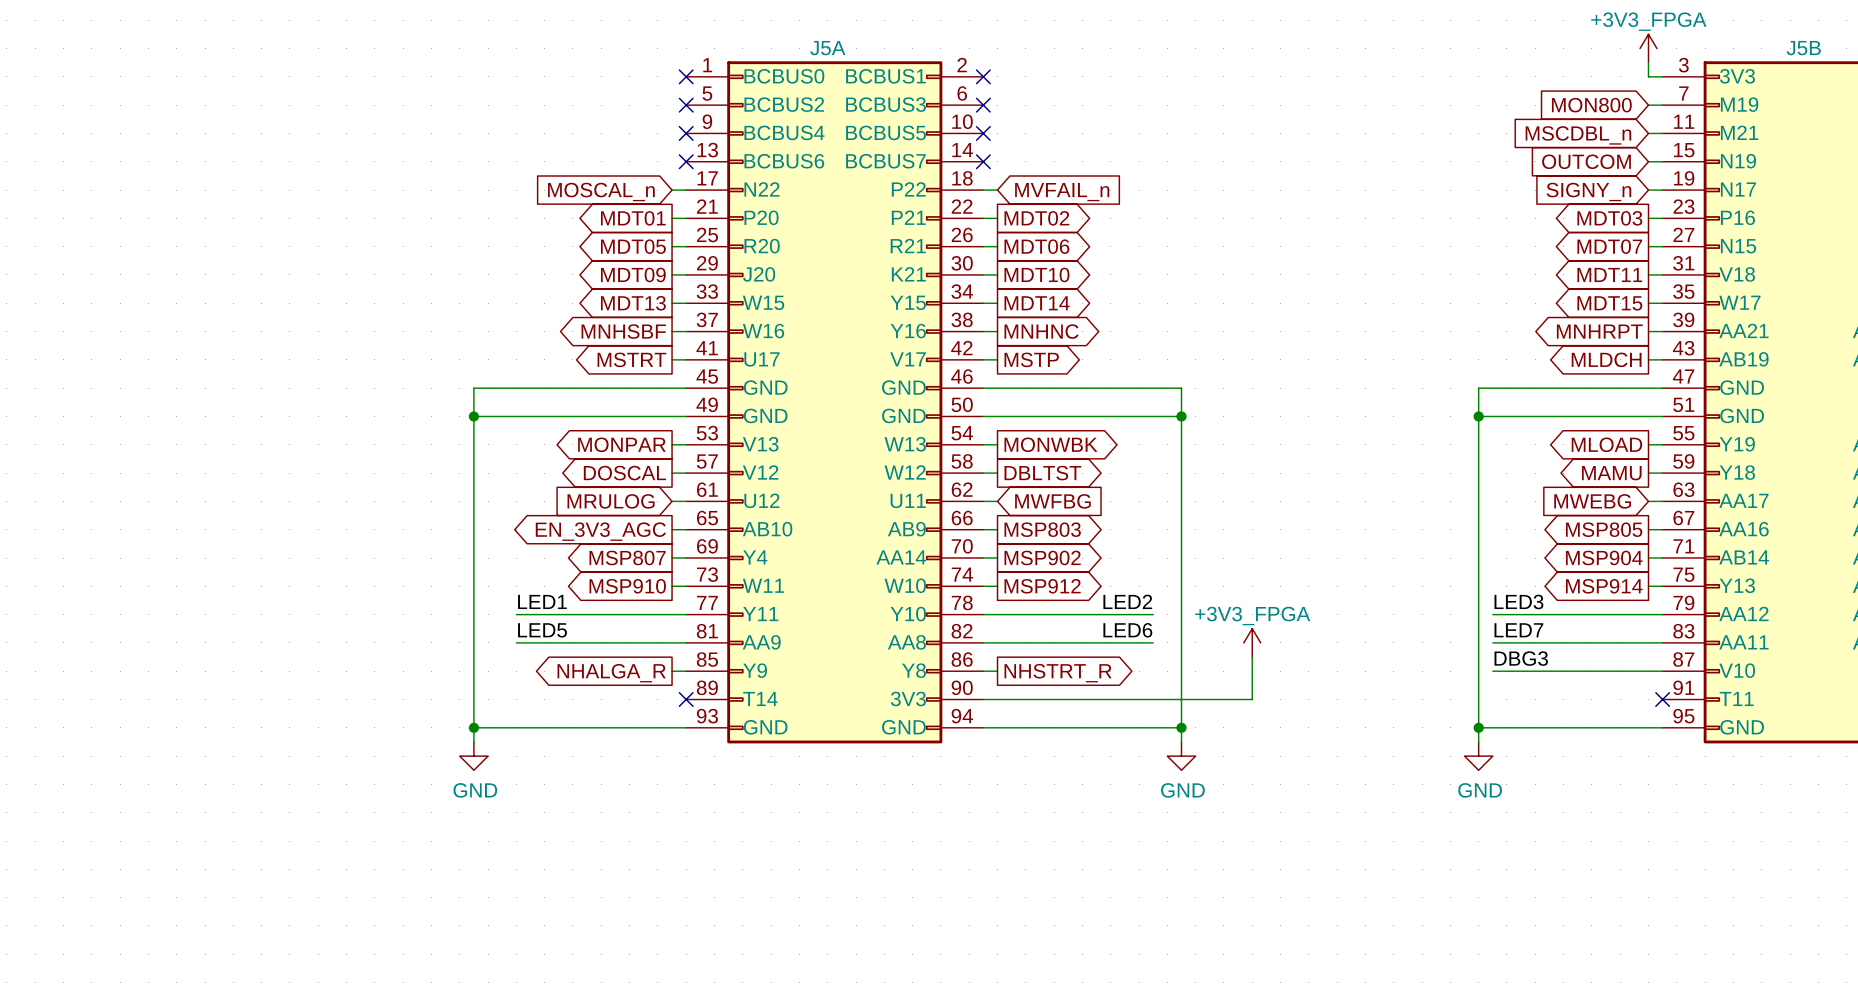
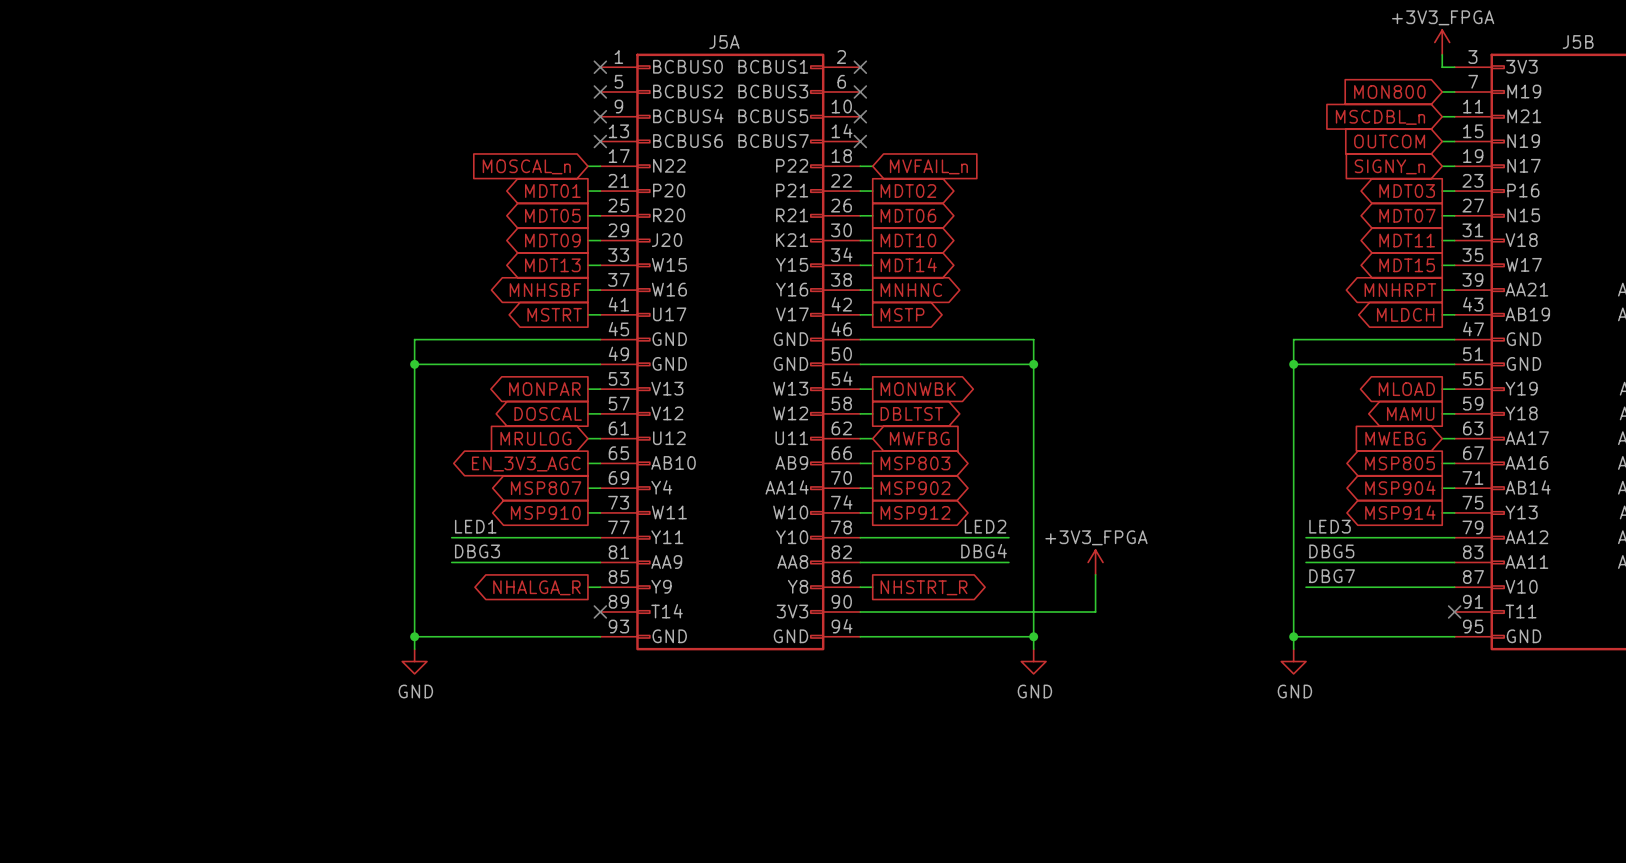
label: LED5 (542, 630) -> DBG3 (477, 551)
label: LED6 (1127, 630) -> DBG4 (984, 551)
label: LED7 (1518, 630) -> DBG5 (1331, 551)
label: DBG3 (1521, 658) -> DBG7 (1332, 576)

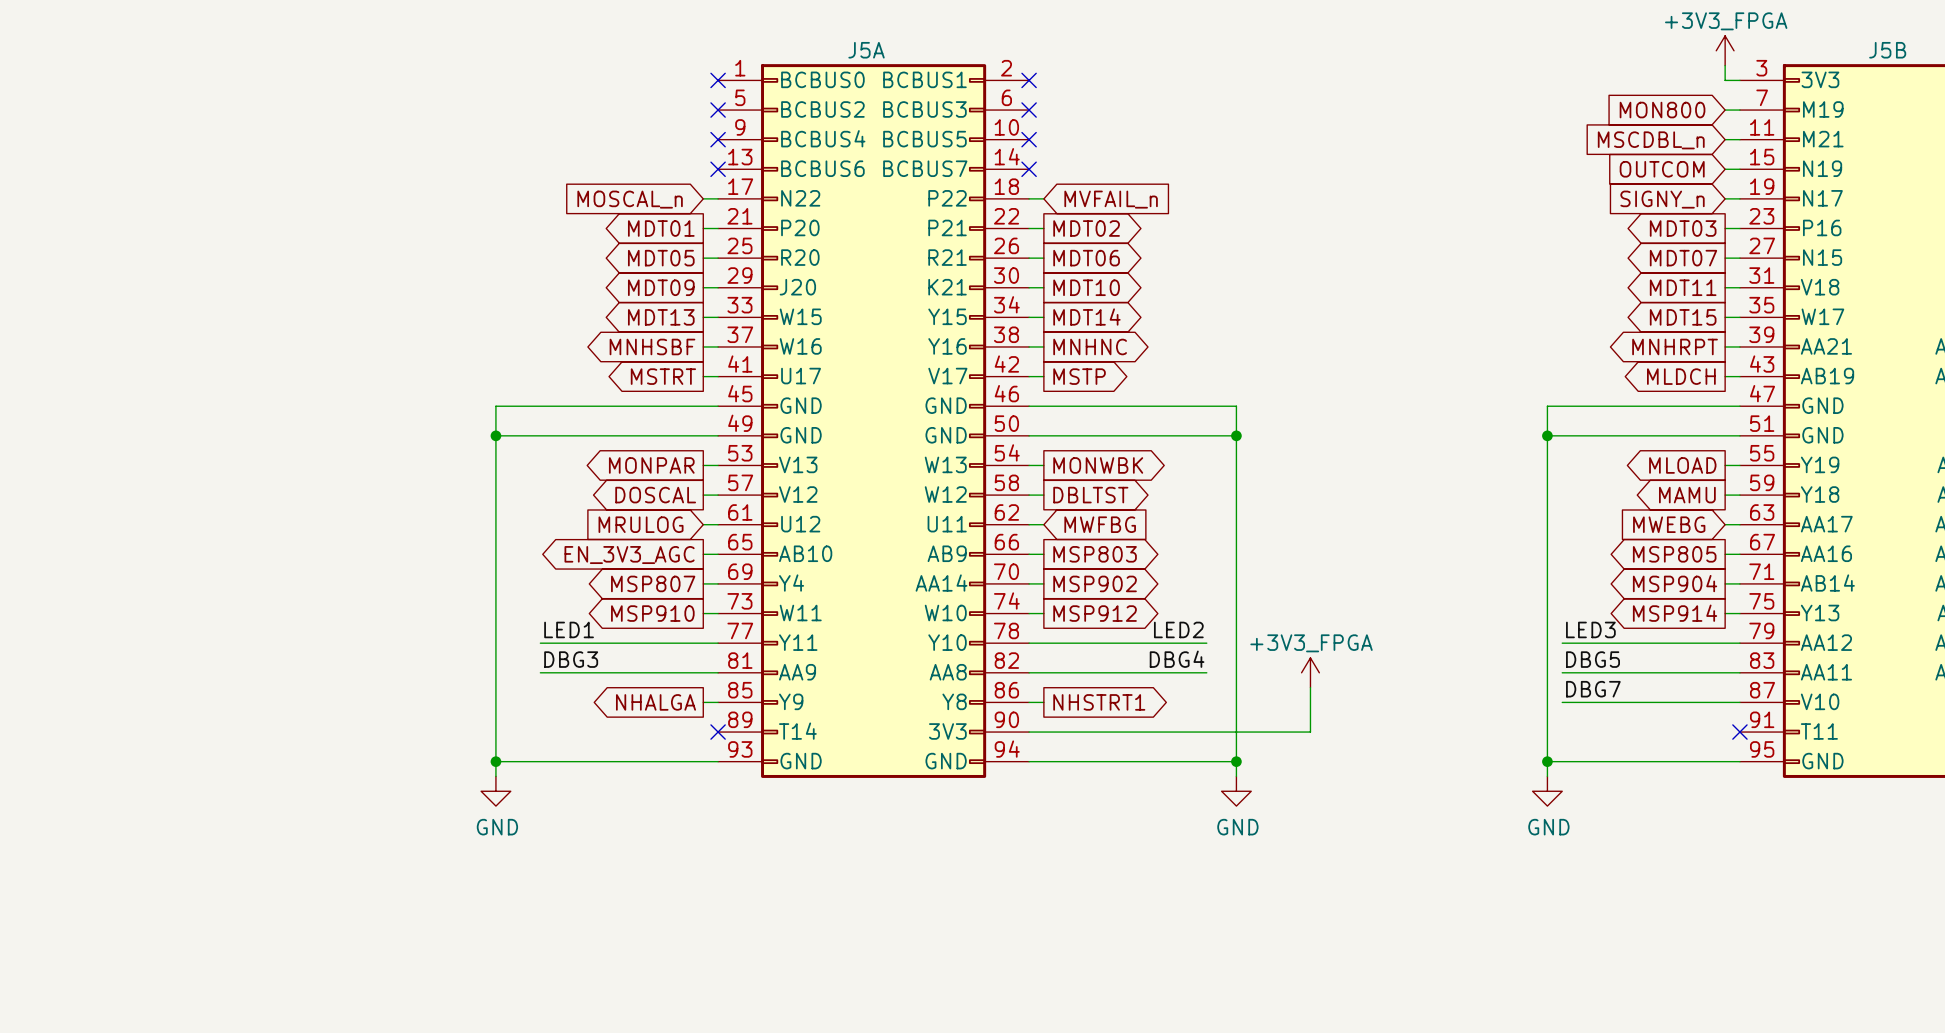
global label: NHALGA_R (536, 587) -> NHALGA (656, 702)
global label: NHSTRT_R (924, 587) -> NHSTRT1 (1099, 702)

